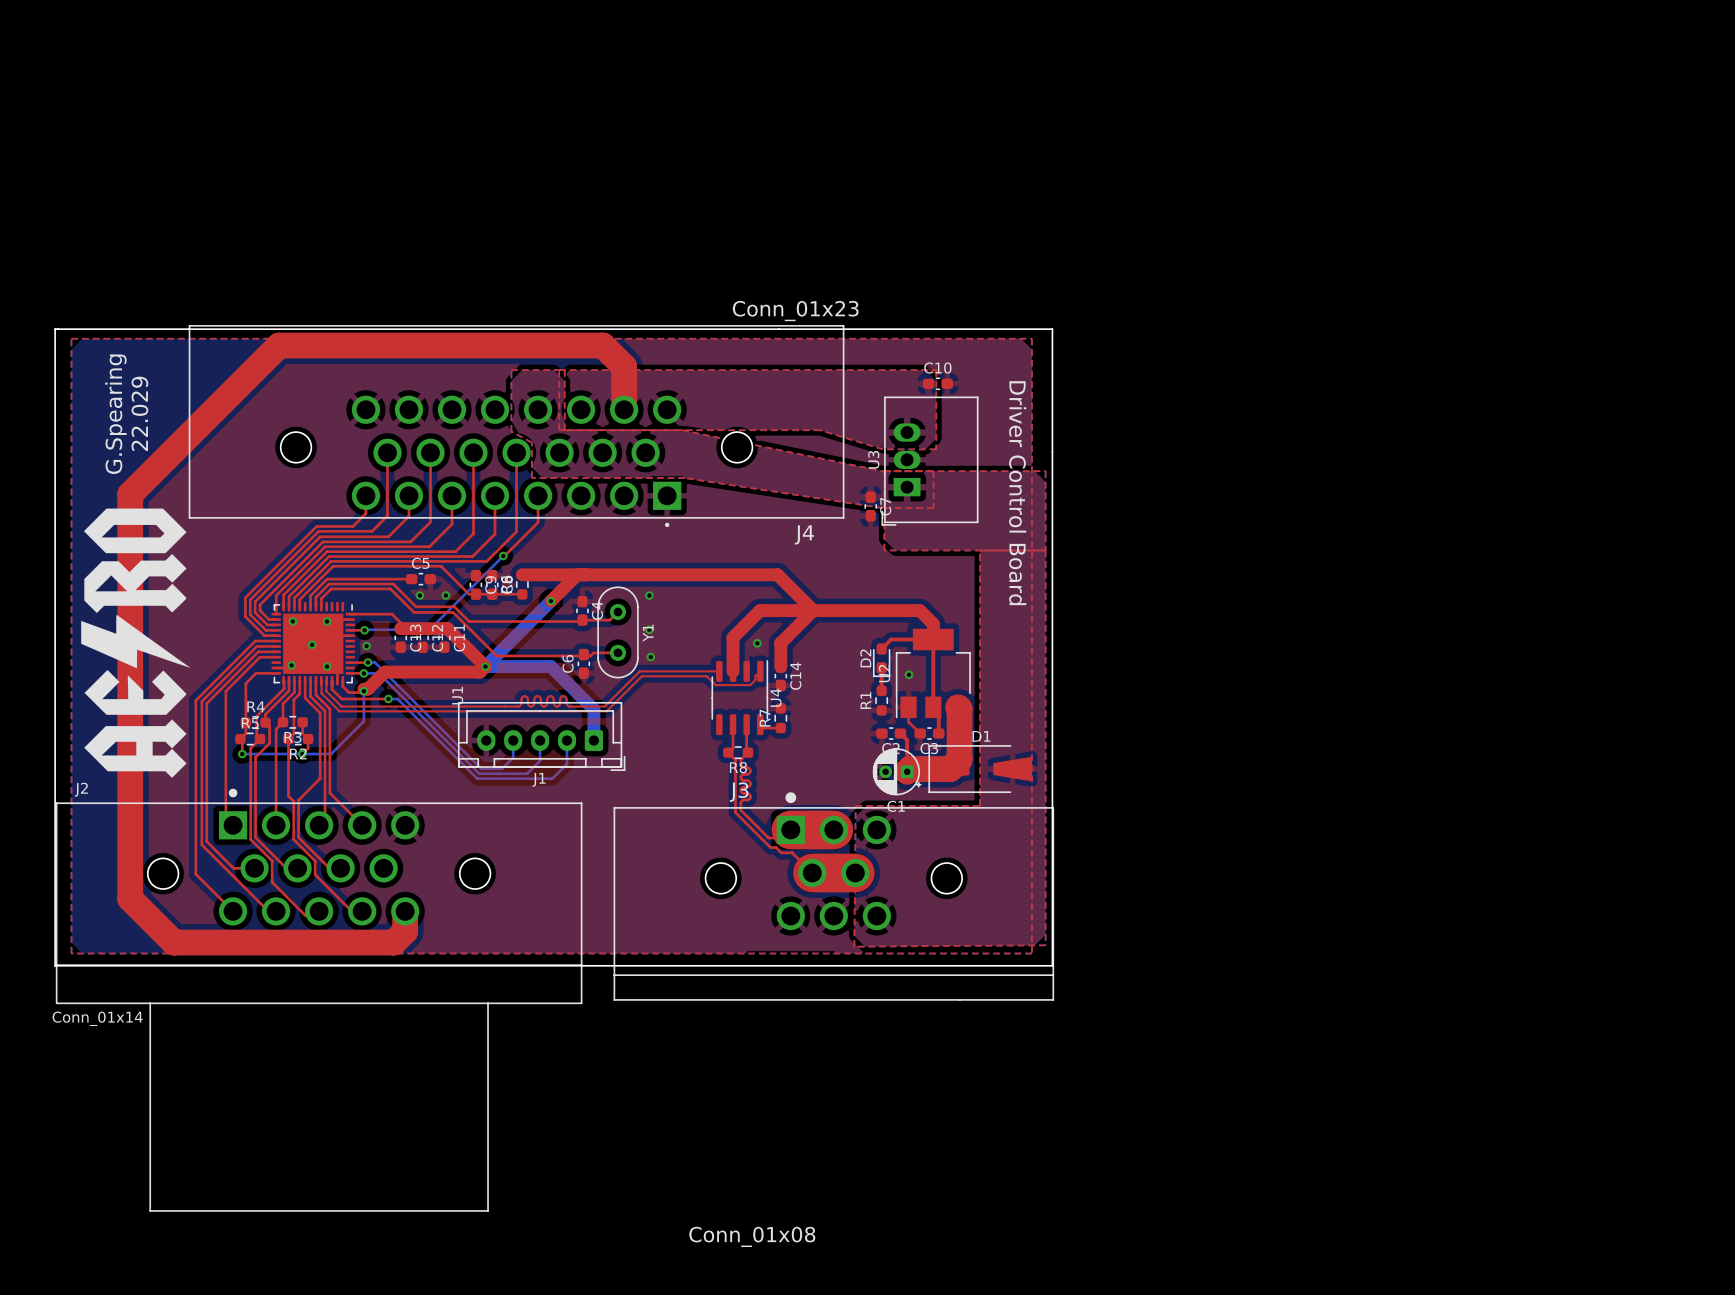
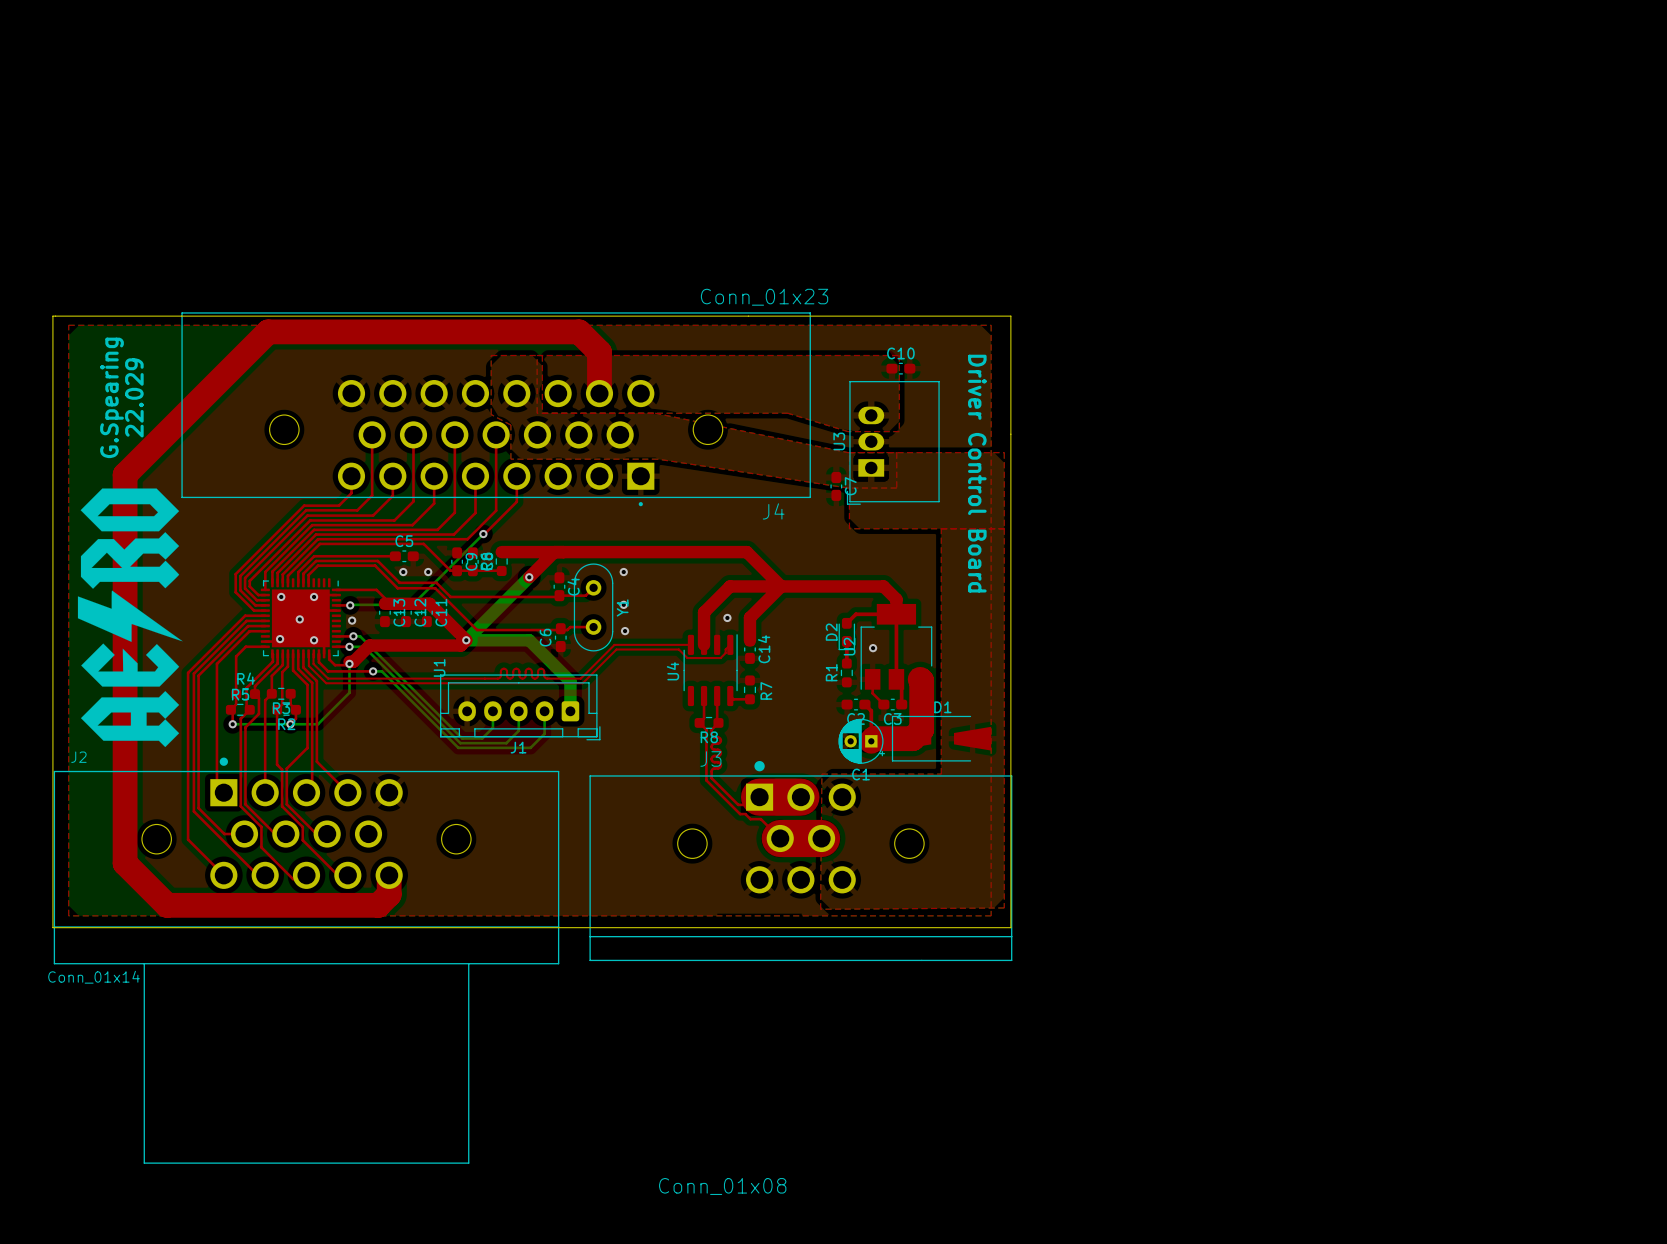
U4 name position: U4 (776, 697) -> U4 (672, 671)
R7 name position: R7 (765, 718) -> R7 (766, 690)

